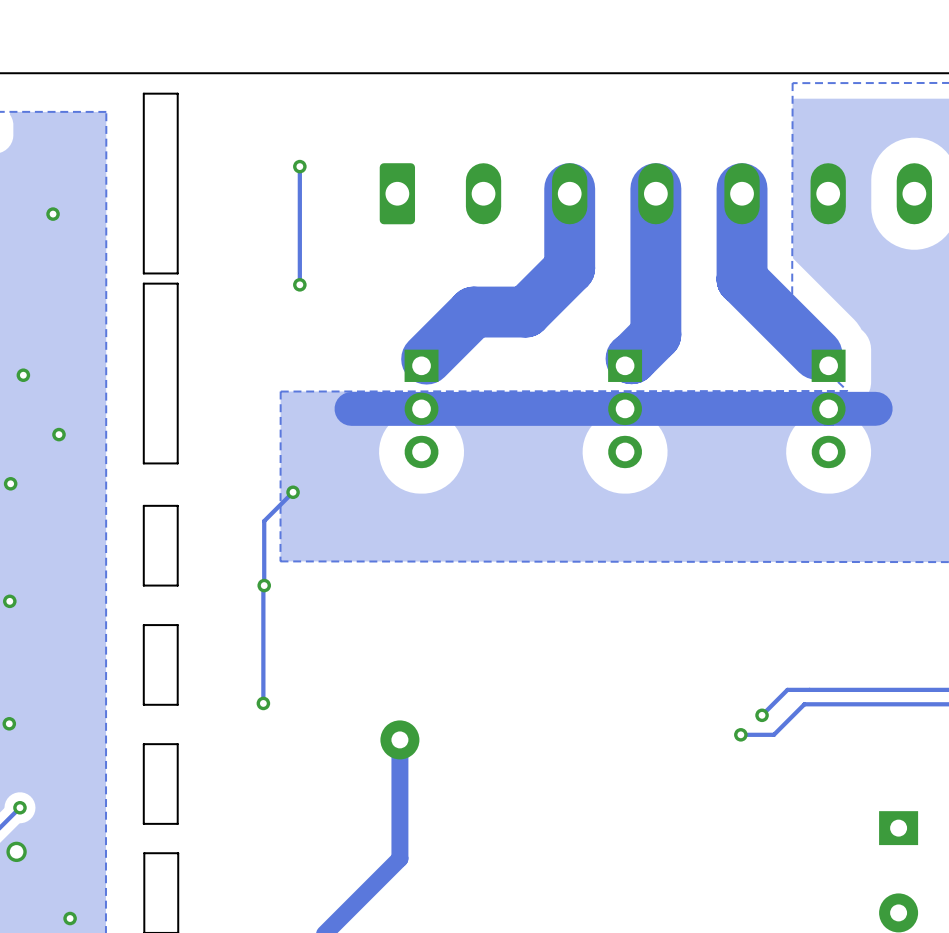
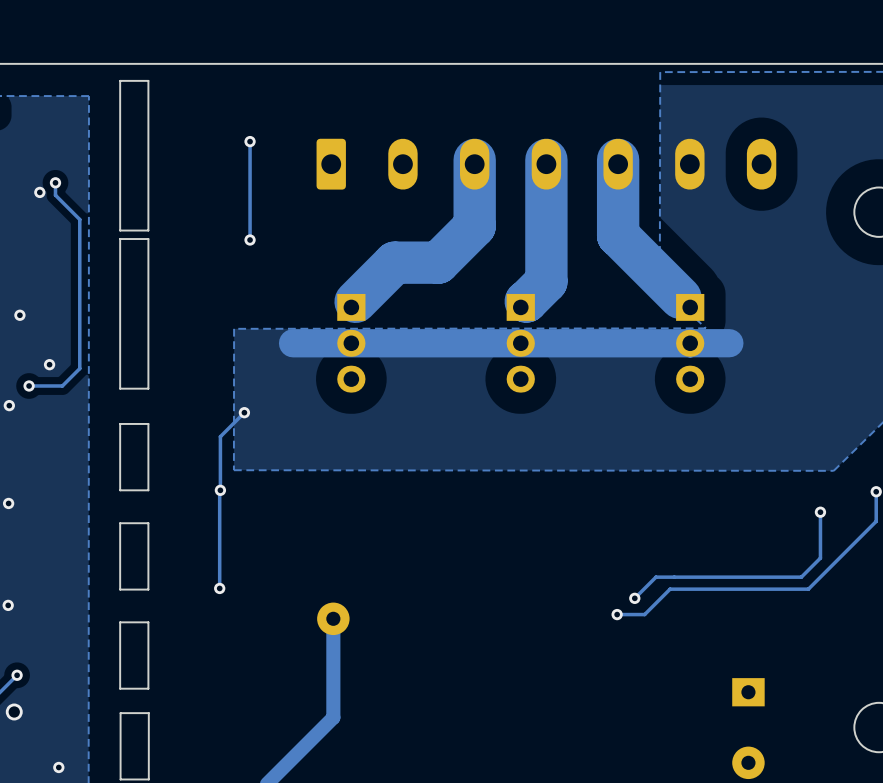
via: (53, 214) -> none
track: none -> (55, 182) (55, 195) (79, 219) (79, 368) (62, 385) (29, 385)
via: none -> (55, 182)
via: none -> (39, 192)
via: none -> (29, 385)

